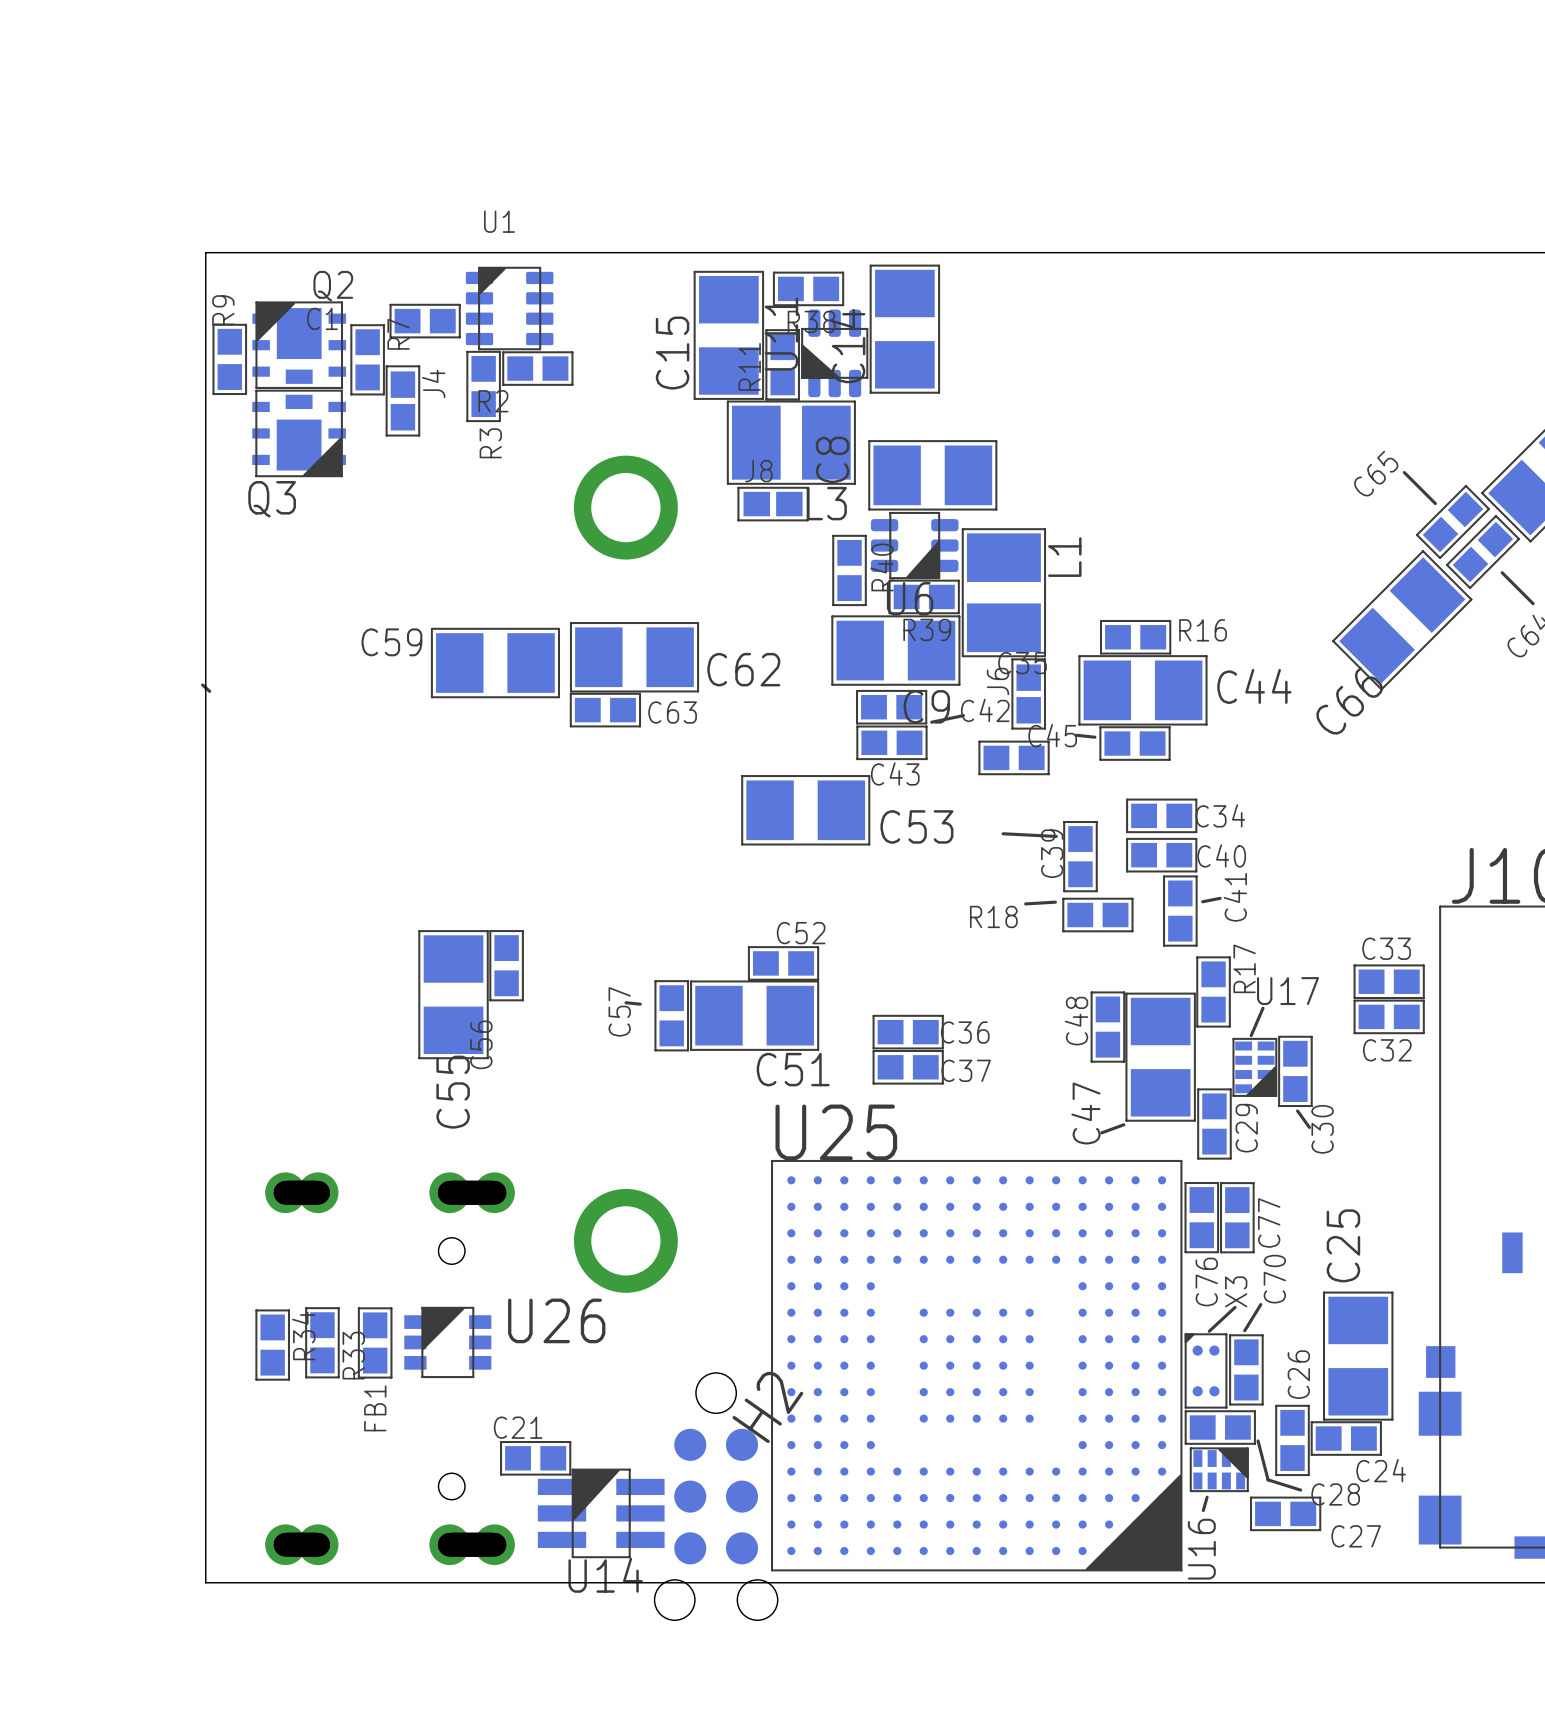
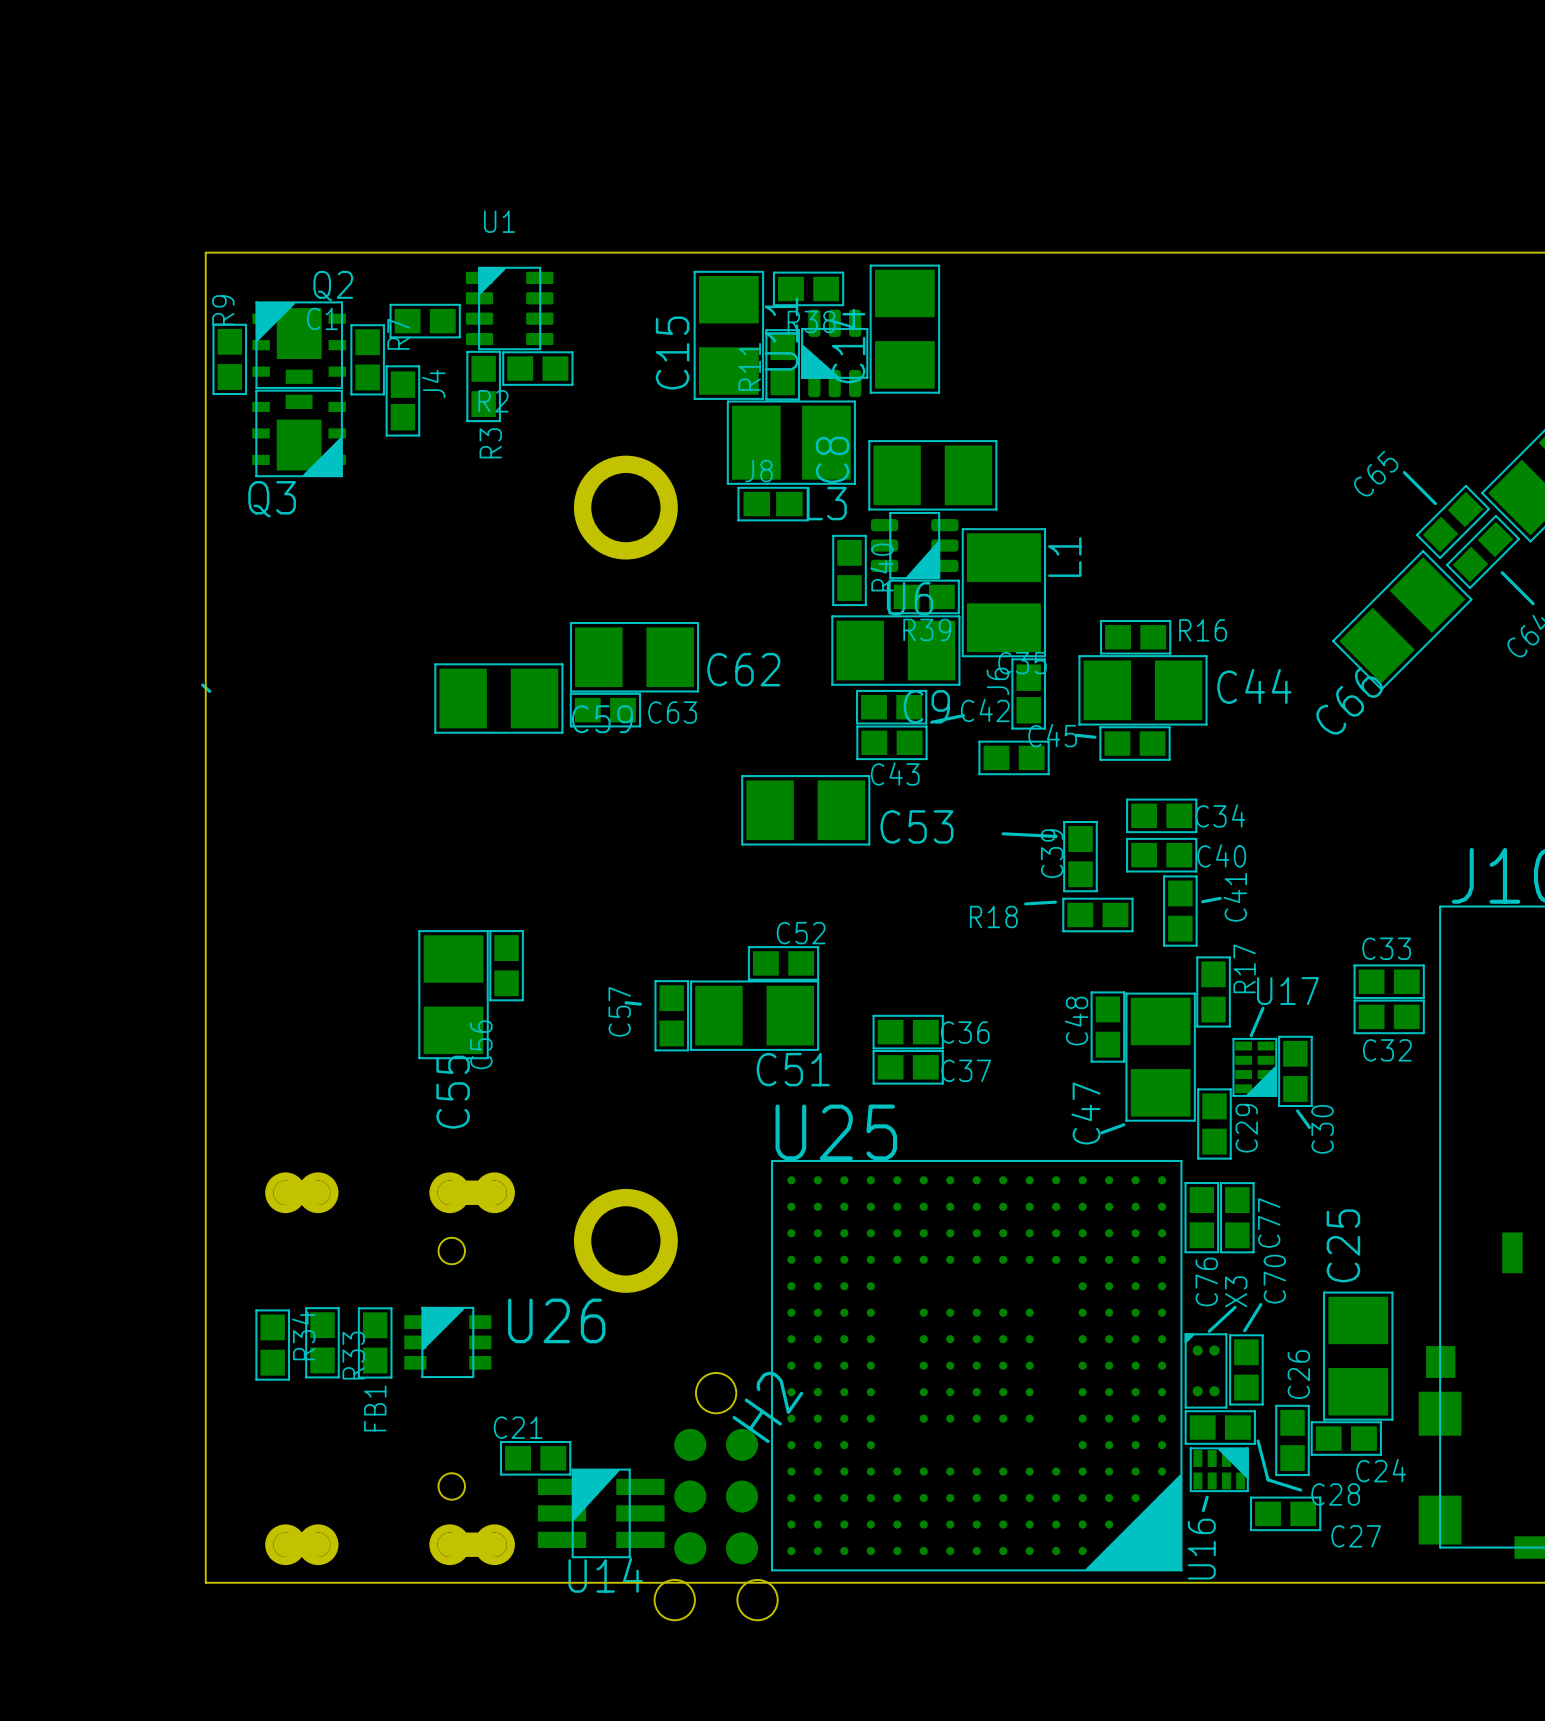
C59 name position: C59 (391, 642) -> C59 (602, 719)
C59 position: (495, 663) -> (498, 698)

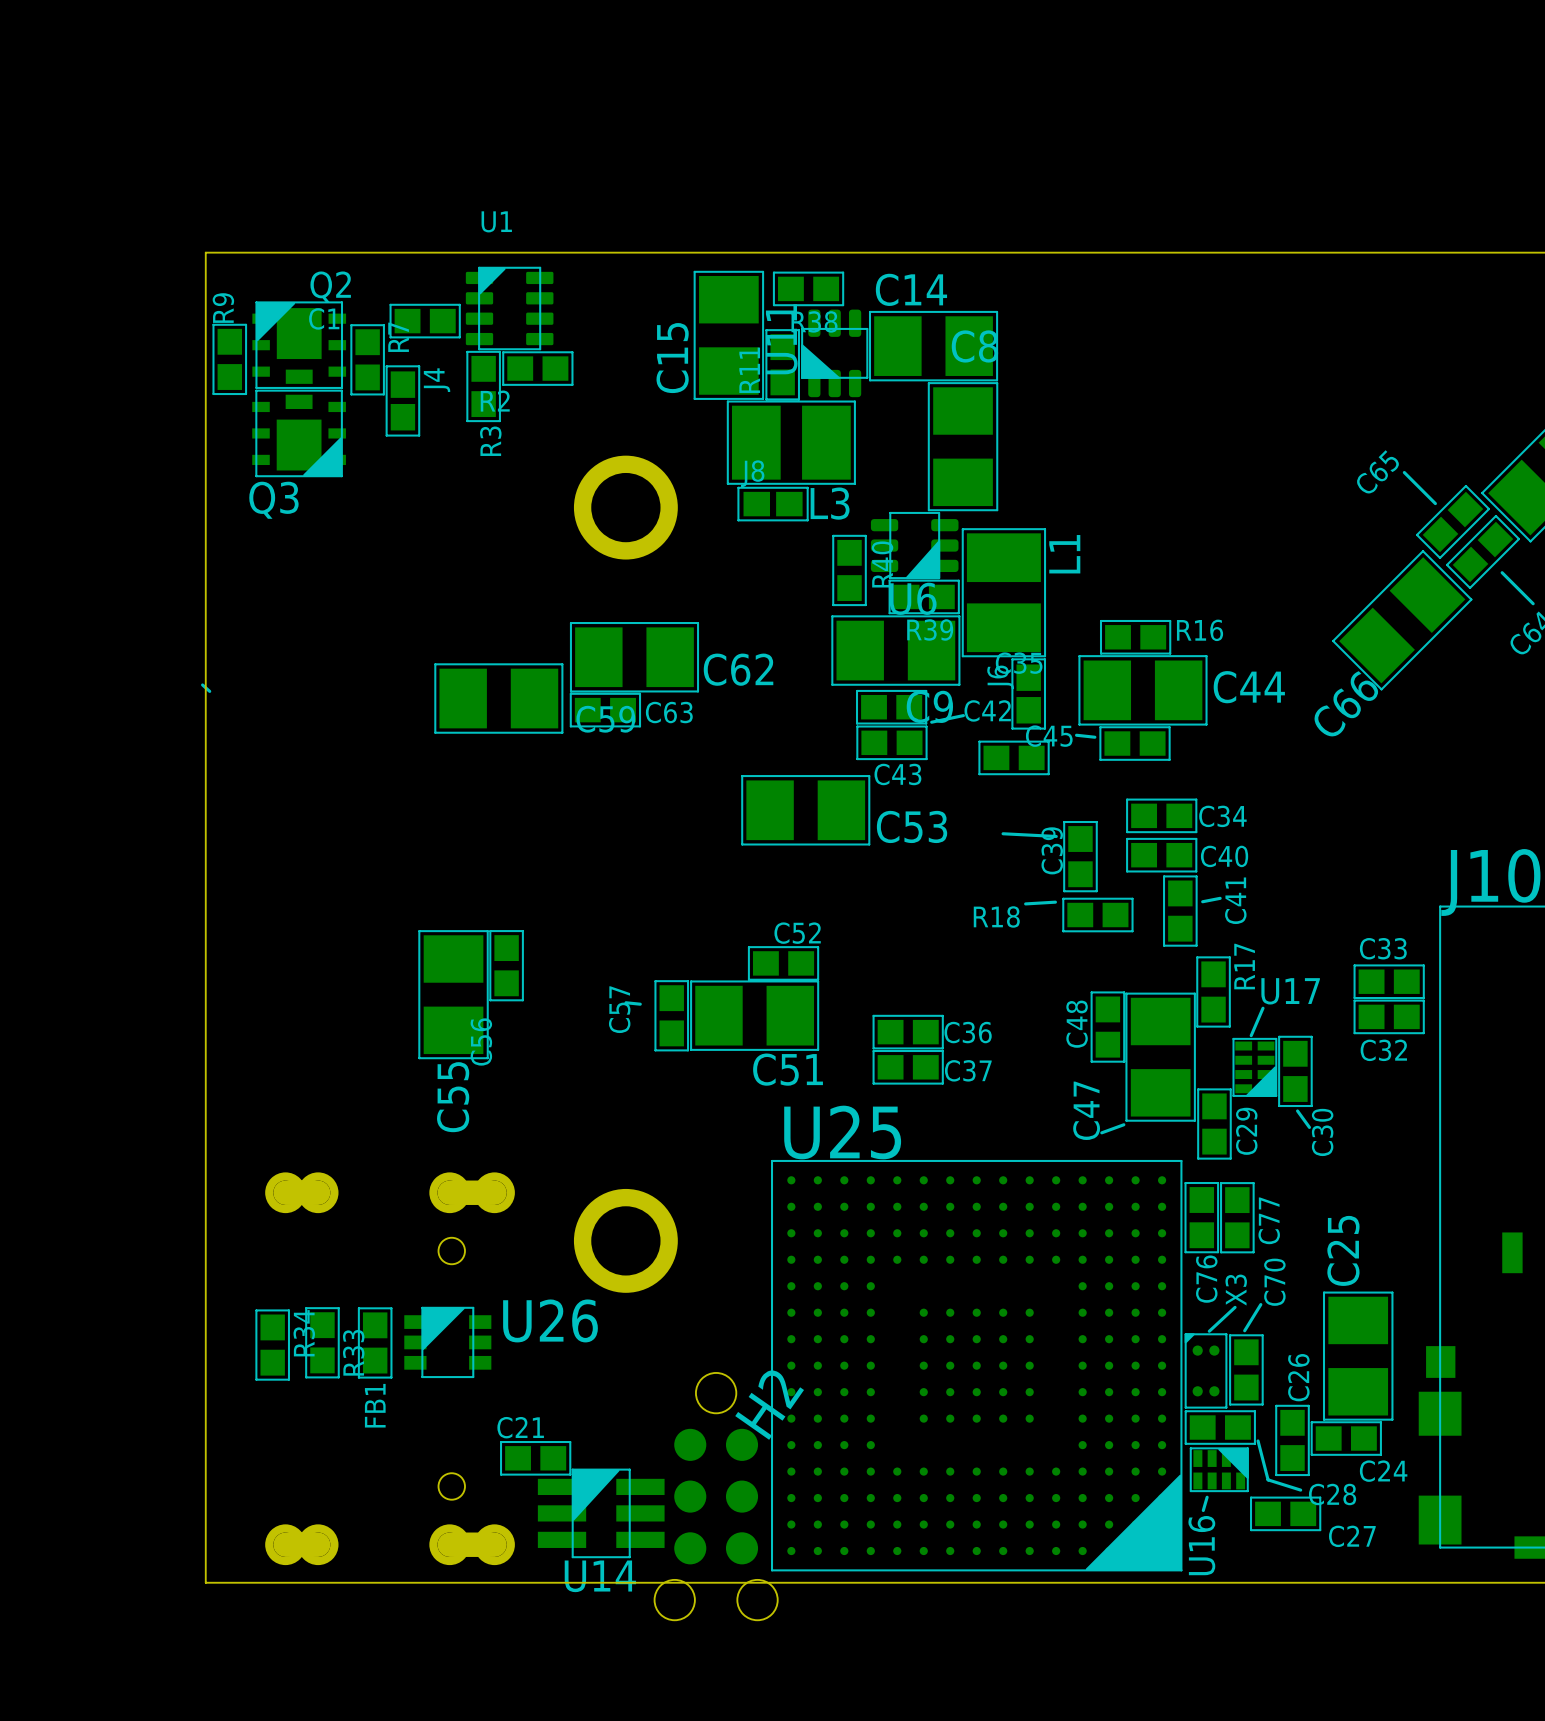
C14 rotation: 0° (904, 329) -> 90° clockwise (933, 346)
C8 rotation: 0° (932, 475) -> 90° clockwise (963, 446)

